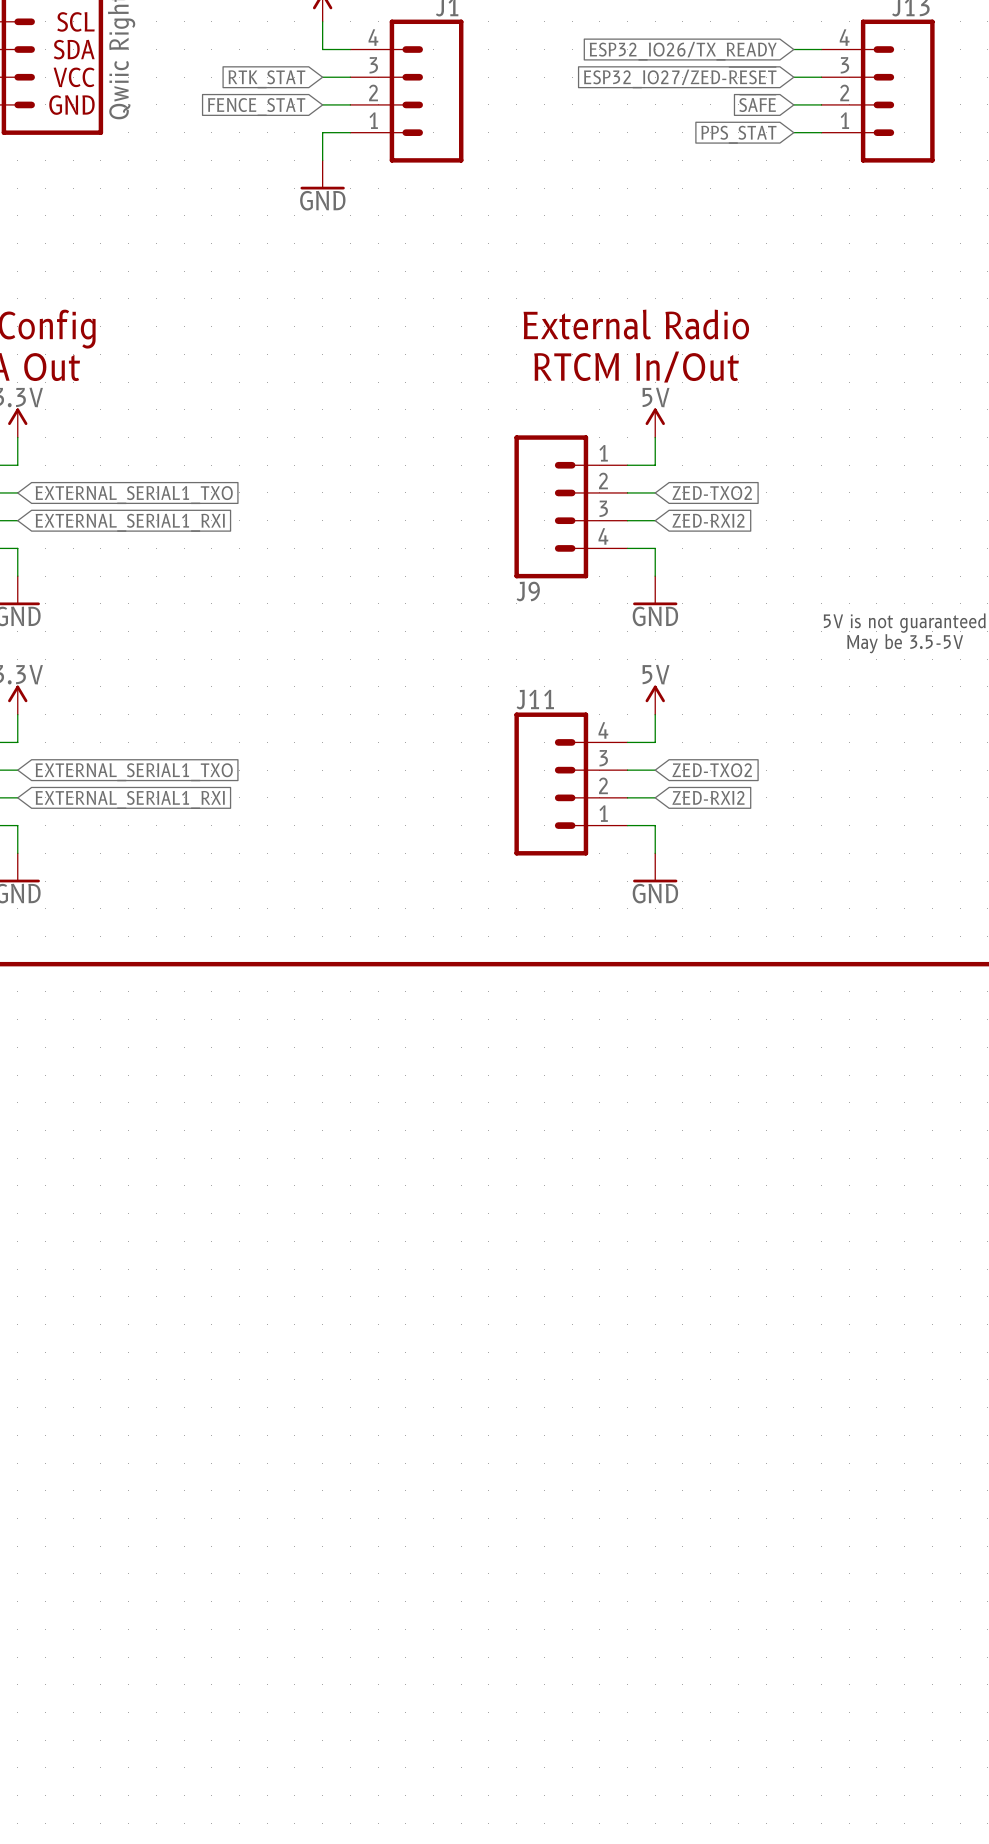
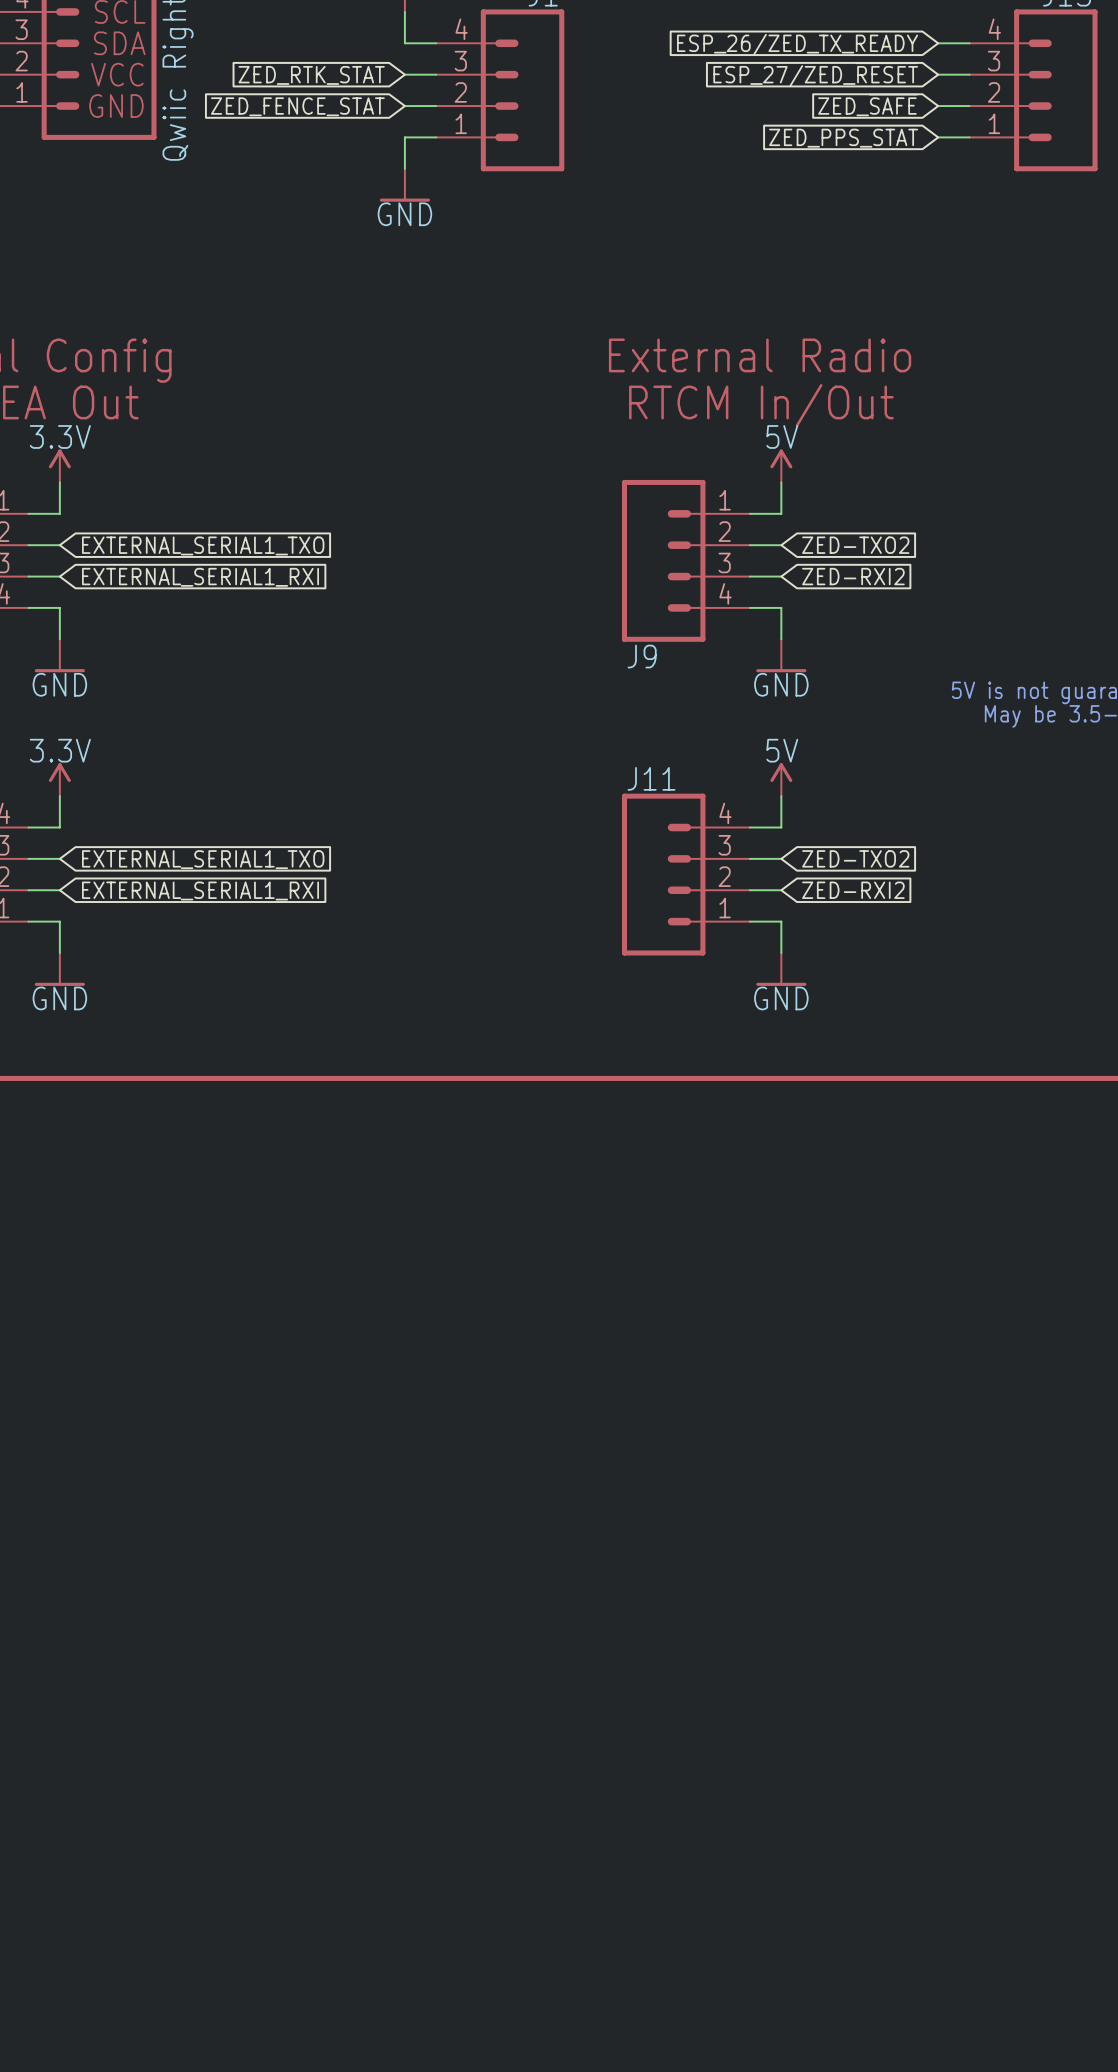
global label: ESP32_IO26/TX_READY (683, 51) -> ESP_26/ZED_TX_READY (797, 44)
global label: ESP32_IO27/ZED-~{RESET} (680, 77) -> ESP_27/ZED_~{RESET} (815, 74)
global label: RTK_STAT (266, 79) -> ZED_RTK_STAT (311, 75)
global label: ~{SAFE} (757, 103) -> ZED_~{SAFE} (868, 104)
global label: FENCE_STAT (256, 107) -> ZED_FENCE_STAT (297, 106)
global label: PPS_STAT (738, 134) -> ZED_PPS_STAT (843, 138)

